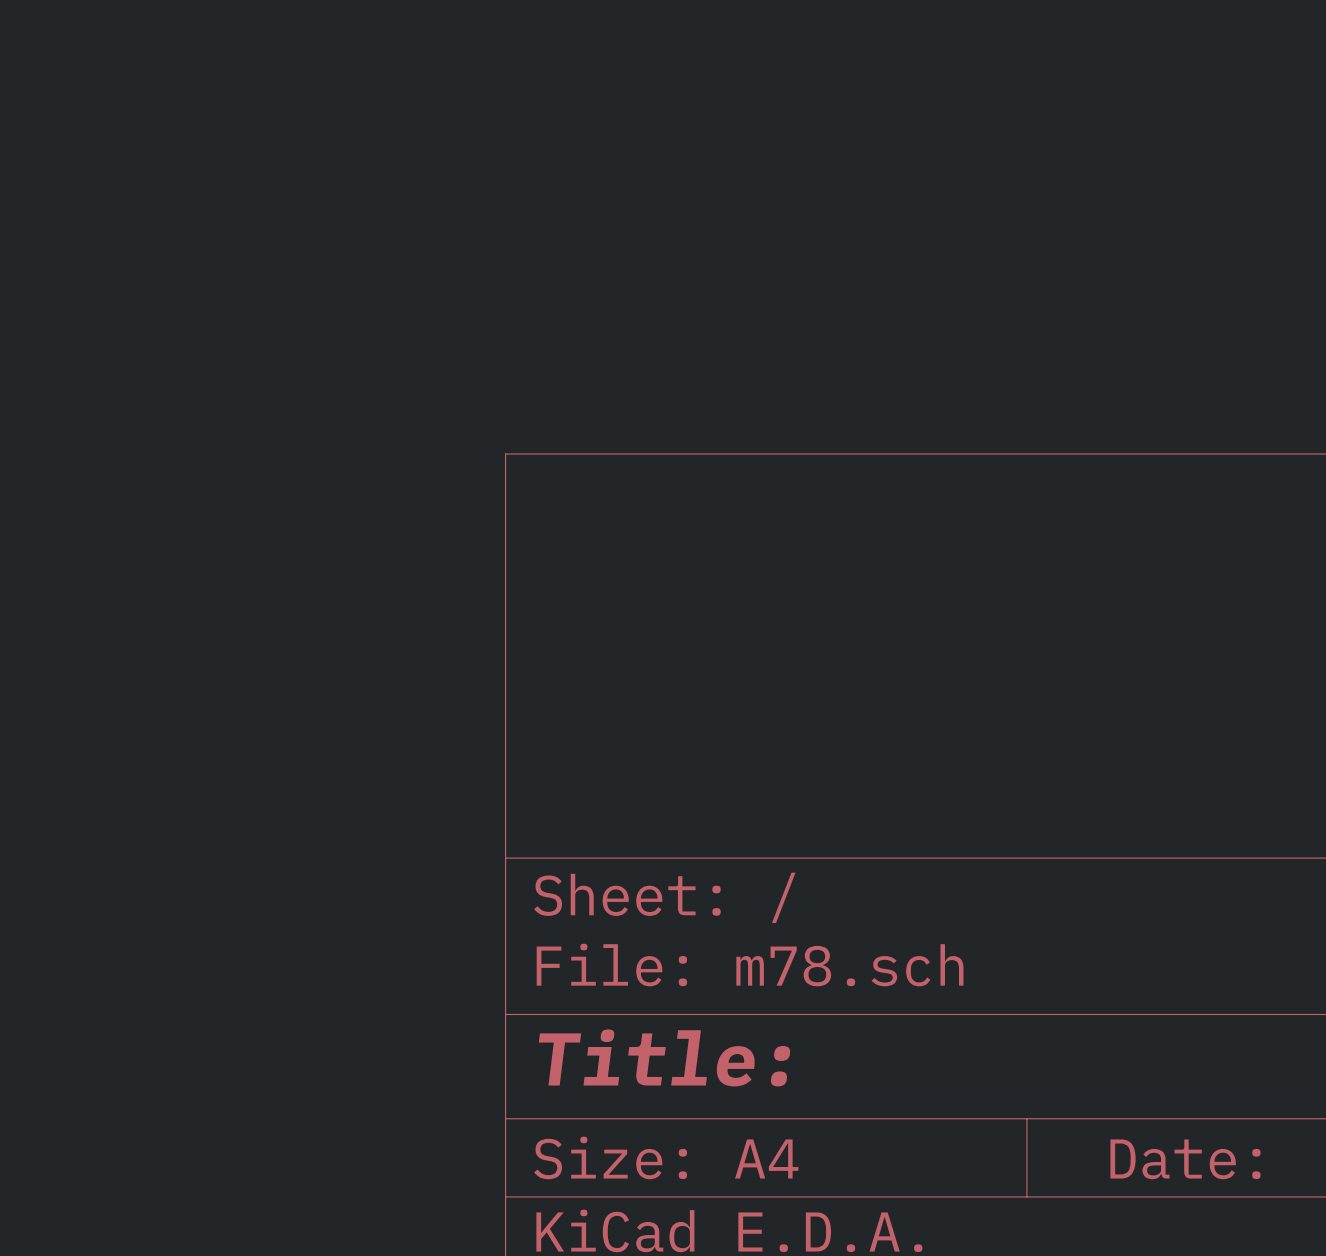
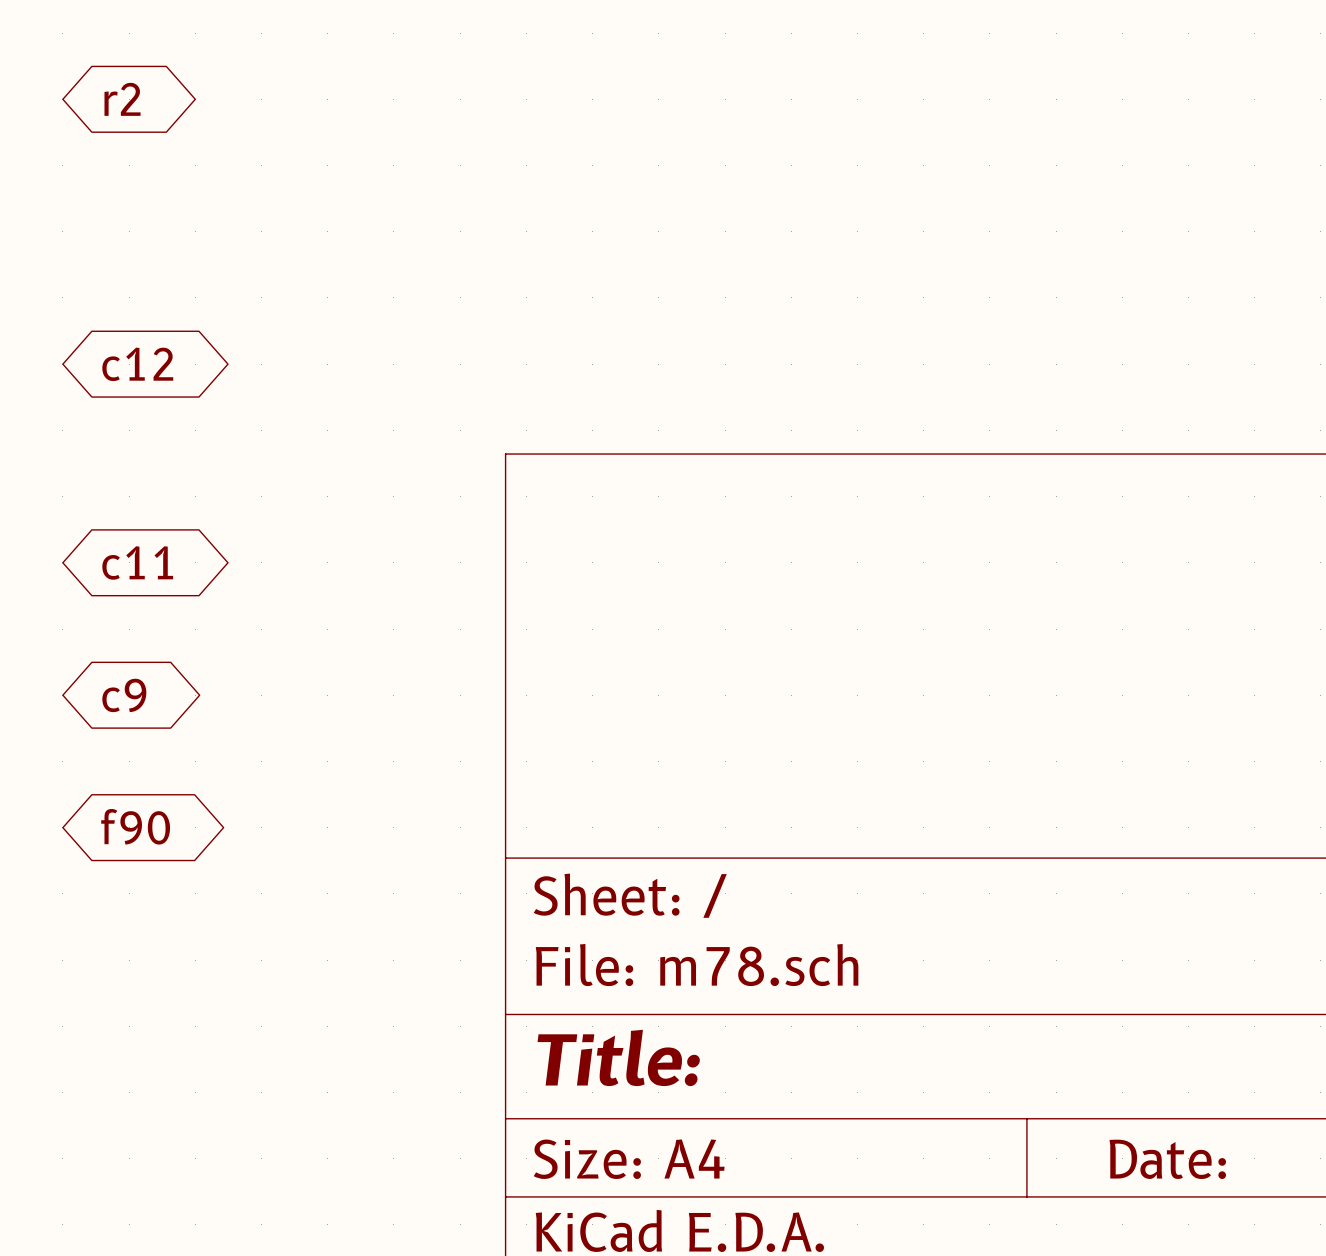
global label: none -> r2 (122, 99)
global label: none -> c12 (137, 364)
global label: none -> c11 (137, 562)
global label: none -> c9 (124, 695)
global label: none -> f90 (135, 826)

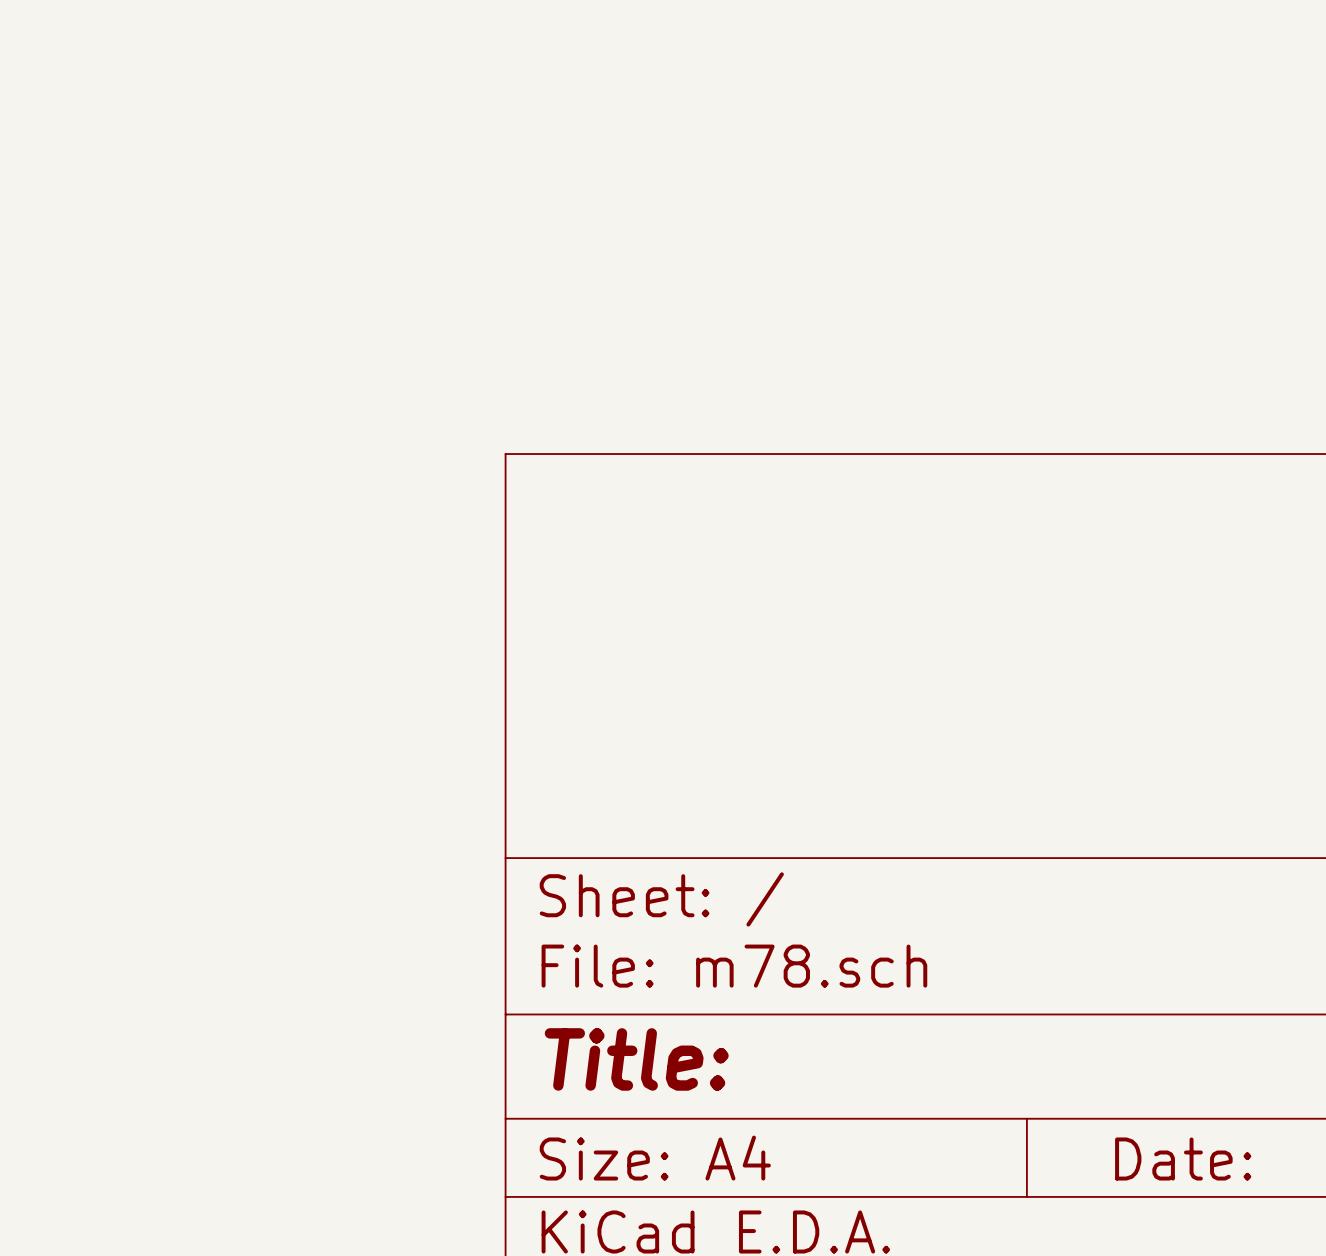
global label: r2 (122, 99) -> none
global label: c12 (137, 364) -> none
global label: c11 (137, 562) -> none
global label: c9 (124, 695) -> none
global label: f90 (135, 826) -> none

